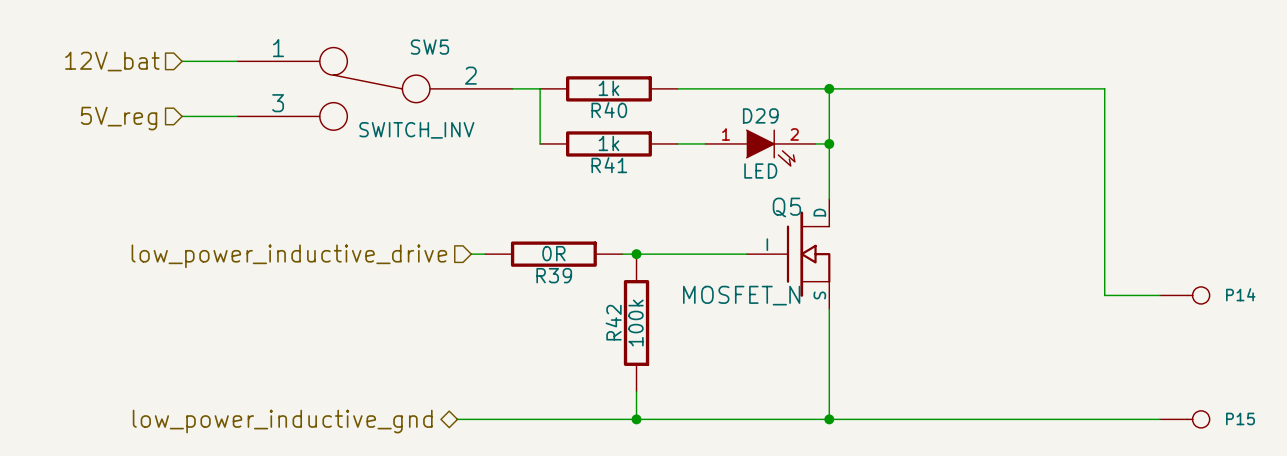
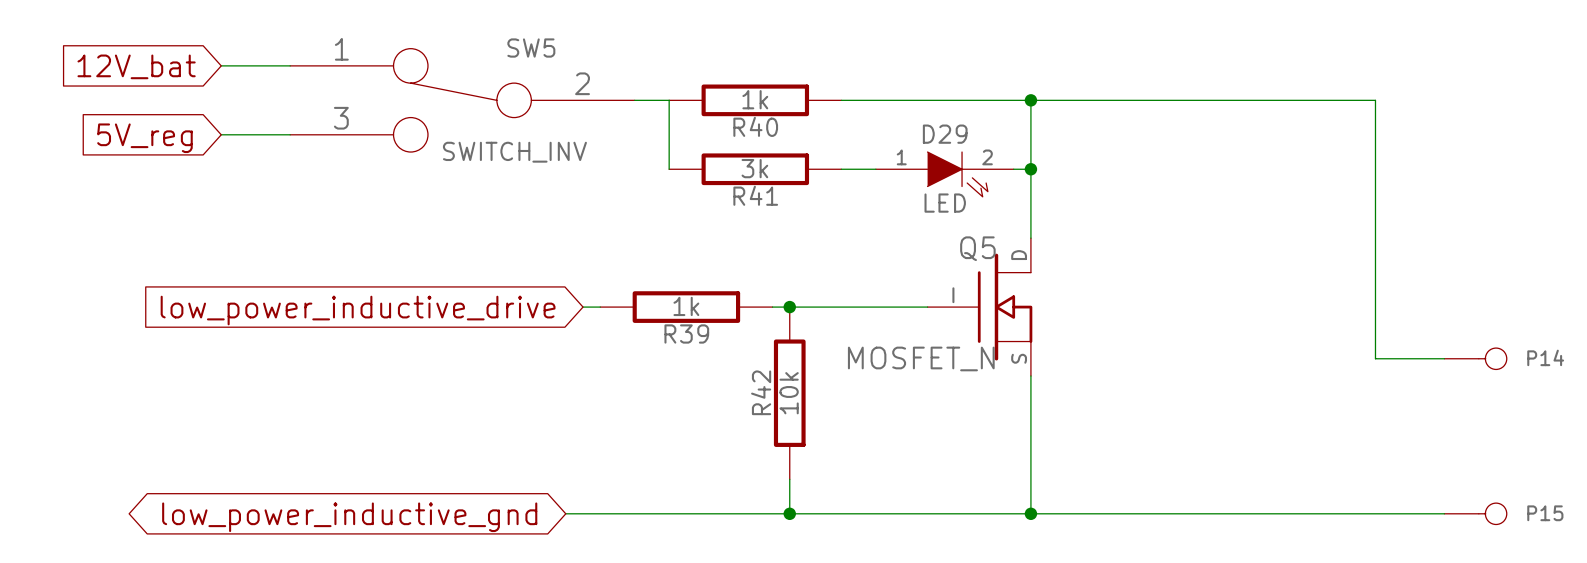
hierarchical label: 12V_bat (112, 61) -> none
global label: none -> 12V_bat (136, 66)
hierarchical label: 5V_reg (119, 118) -> none
global label: none -> 5V_reg (144, 138)
R41 value: 1k (608, 143) -> 3k (754, 168)
R39 value: 0R (553, 253) -> 1k (686, 306)
hierarchical label: low_power_inductive_drive (289, 256) -> none
global label: none -> low_power_inductive_drive (358, 310)
R42 value: 100k (636, 322) -> 10k (789, 393)
hierarchical label: low_power_inductive_gnd (282, 421) -> none
global label: none -> low_power_inductive_gnd (349, 517)

